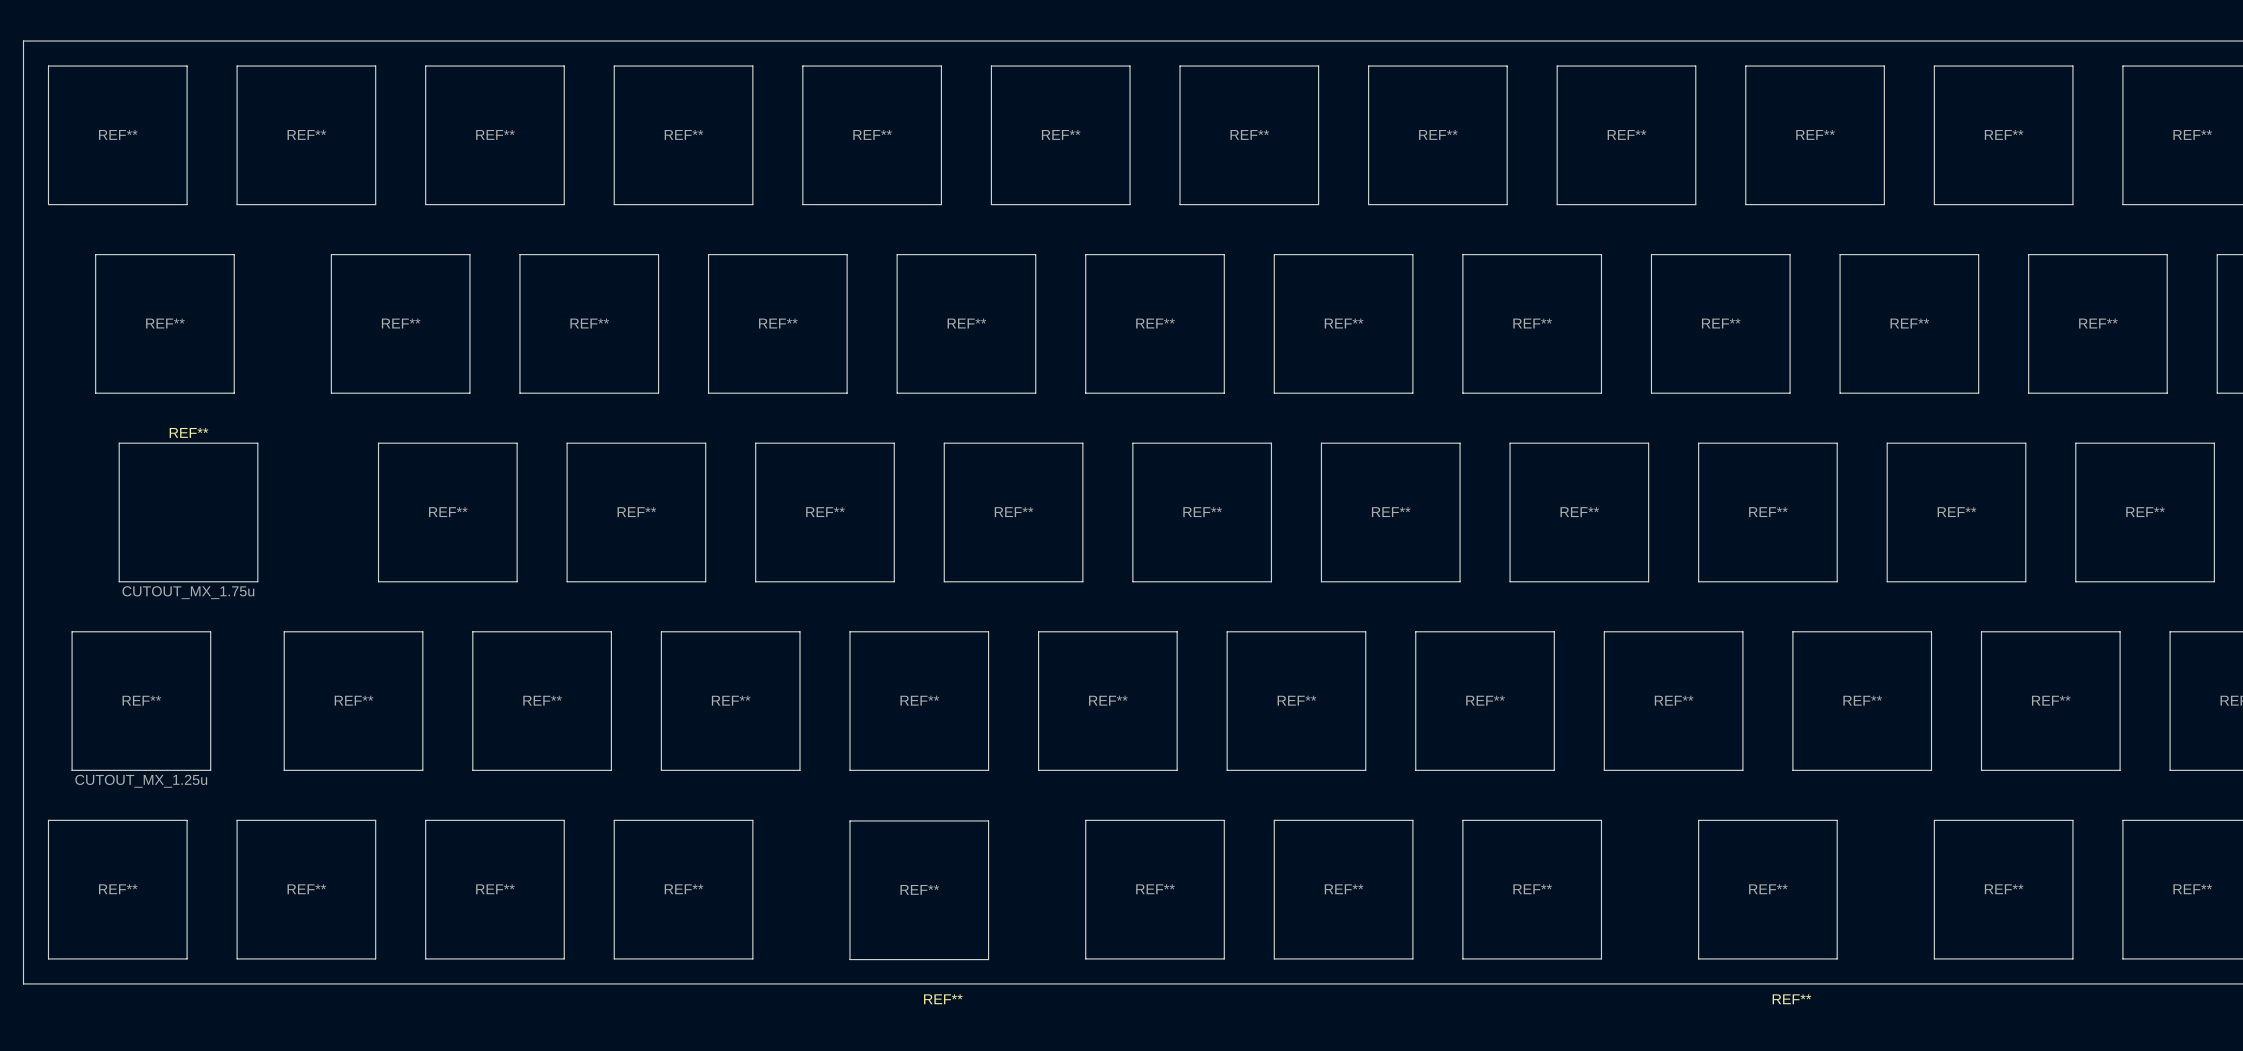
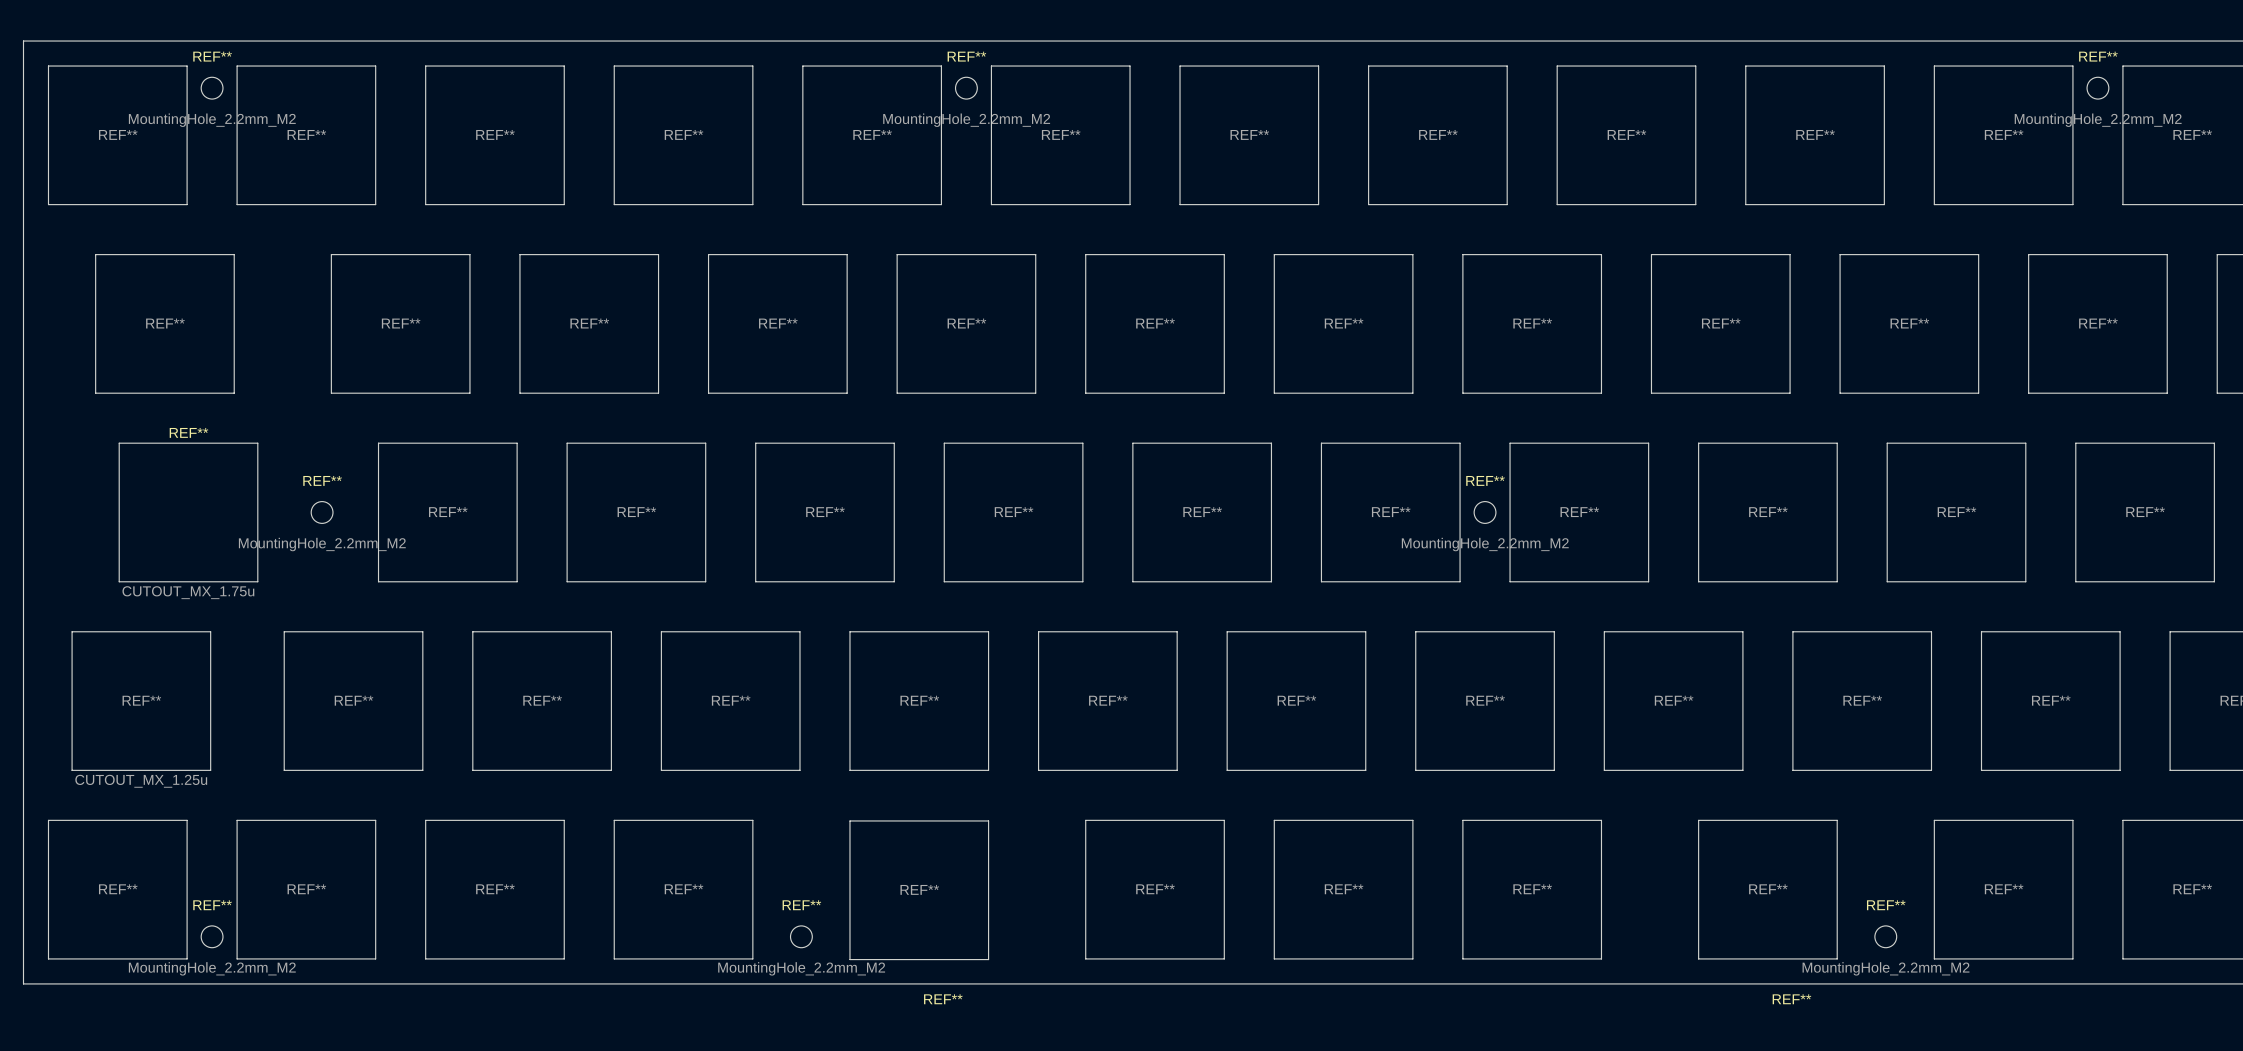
REF**: none -> MountingHole_2.2mm_M2 (212, 88)
REF**: none -> MountingHole_2.2mm_M2 (966, 88)
REF**: none -> MountingHole_2.2mm_M2 (2097, 88)
REF**: none -> MountingHole_2.2mm_M2 (322, 512)
REF**: none -> MountingHole_2.2mm_M2 (1485, 512)
REF**: none -> MountingHole_2.2mm_M2 (212, 936)
REF**: none -> MountingHole_2.2mm_M2 (801, 936)
REF**: none -> MountingHole_2.2mm_M2 (1885, 936)

